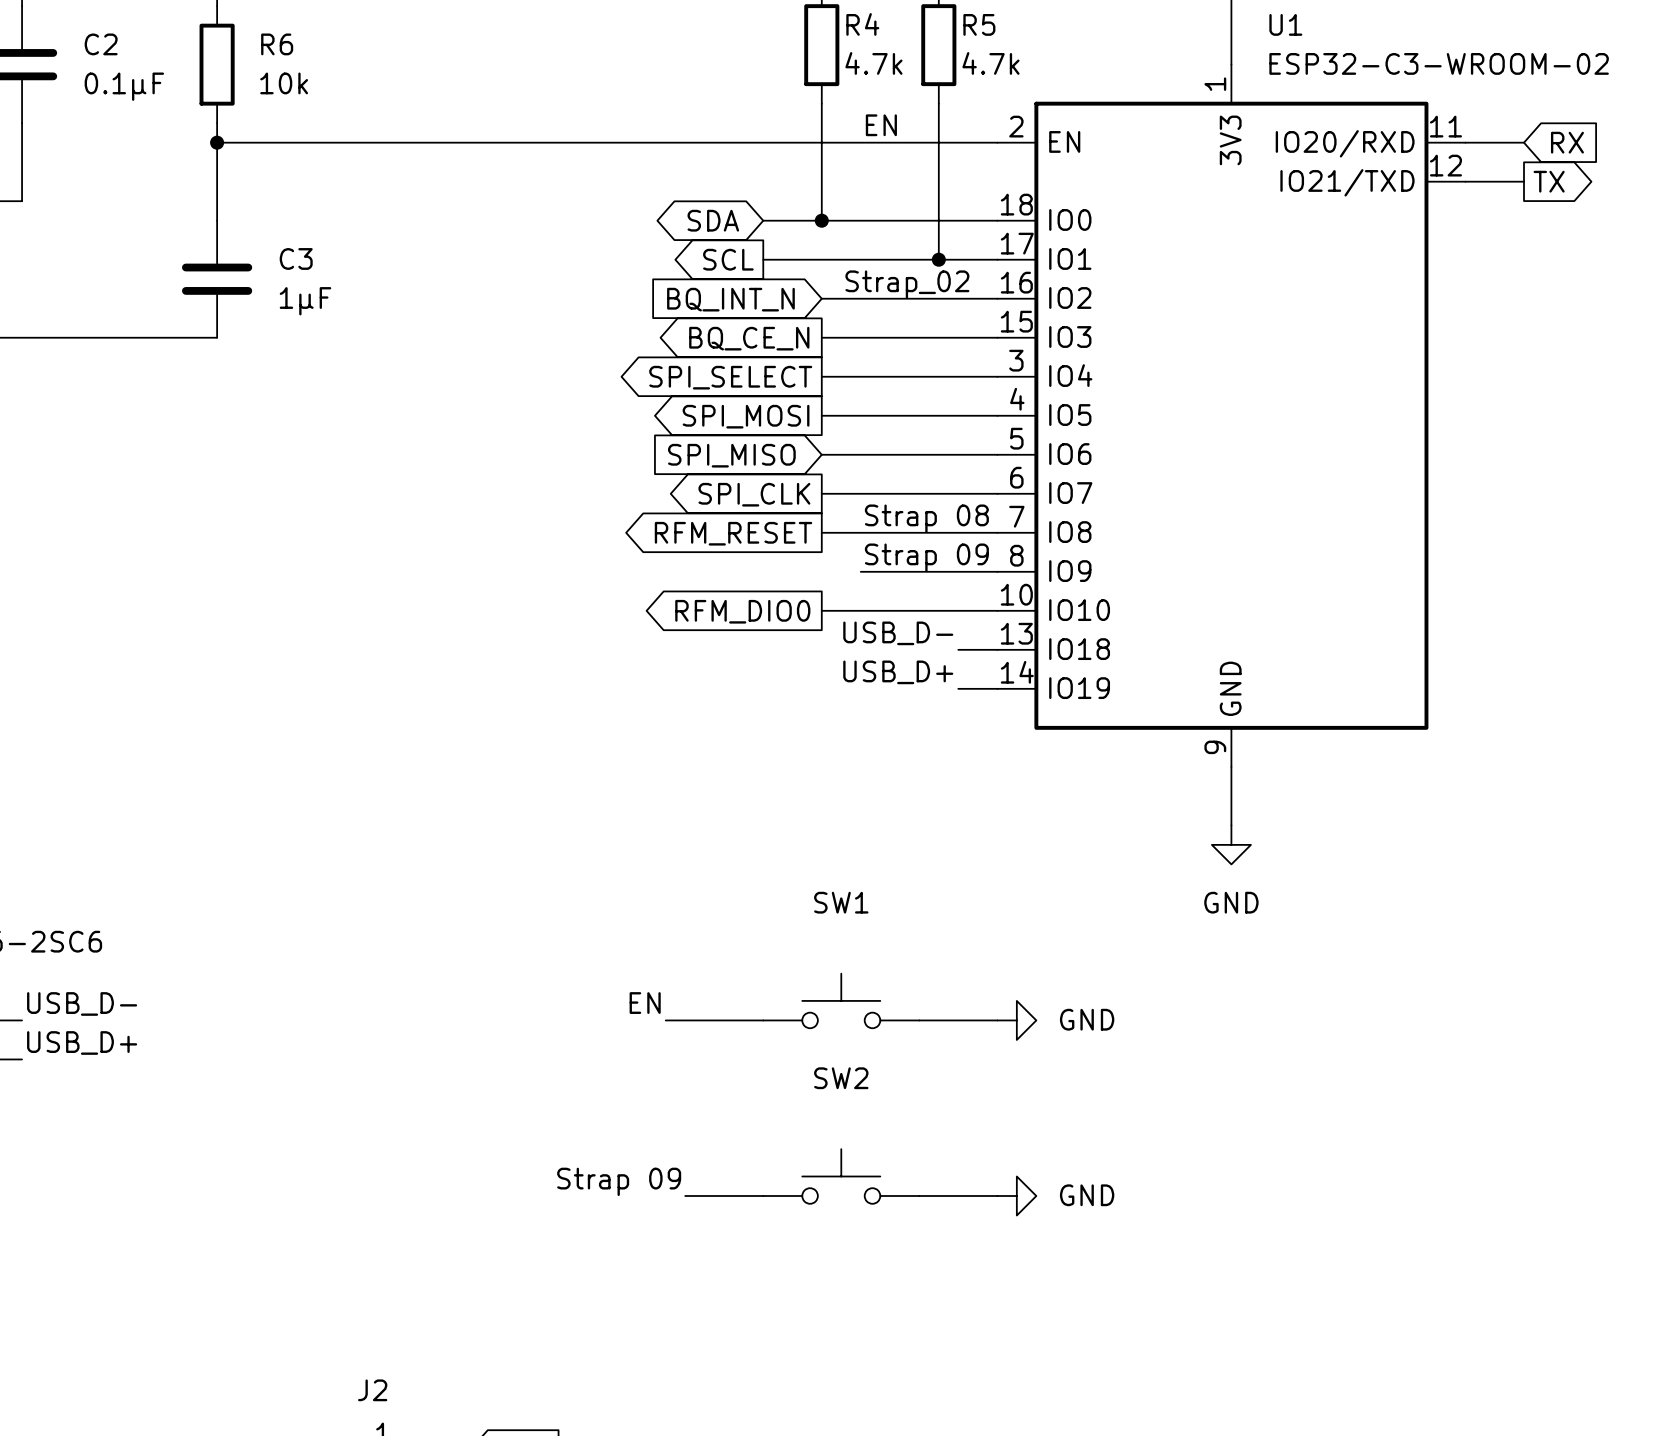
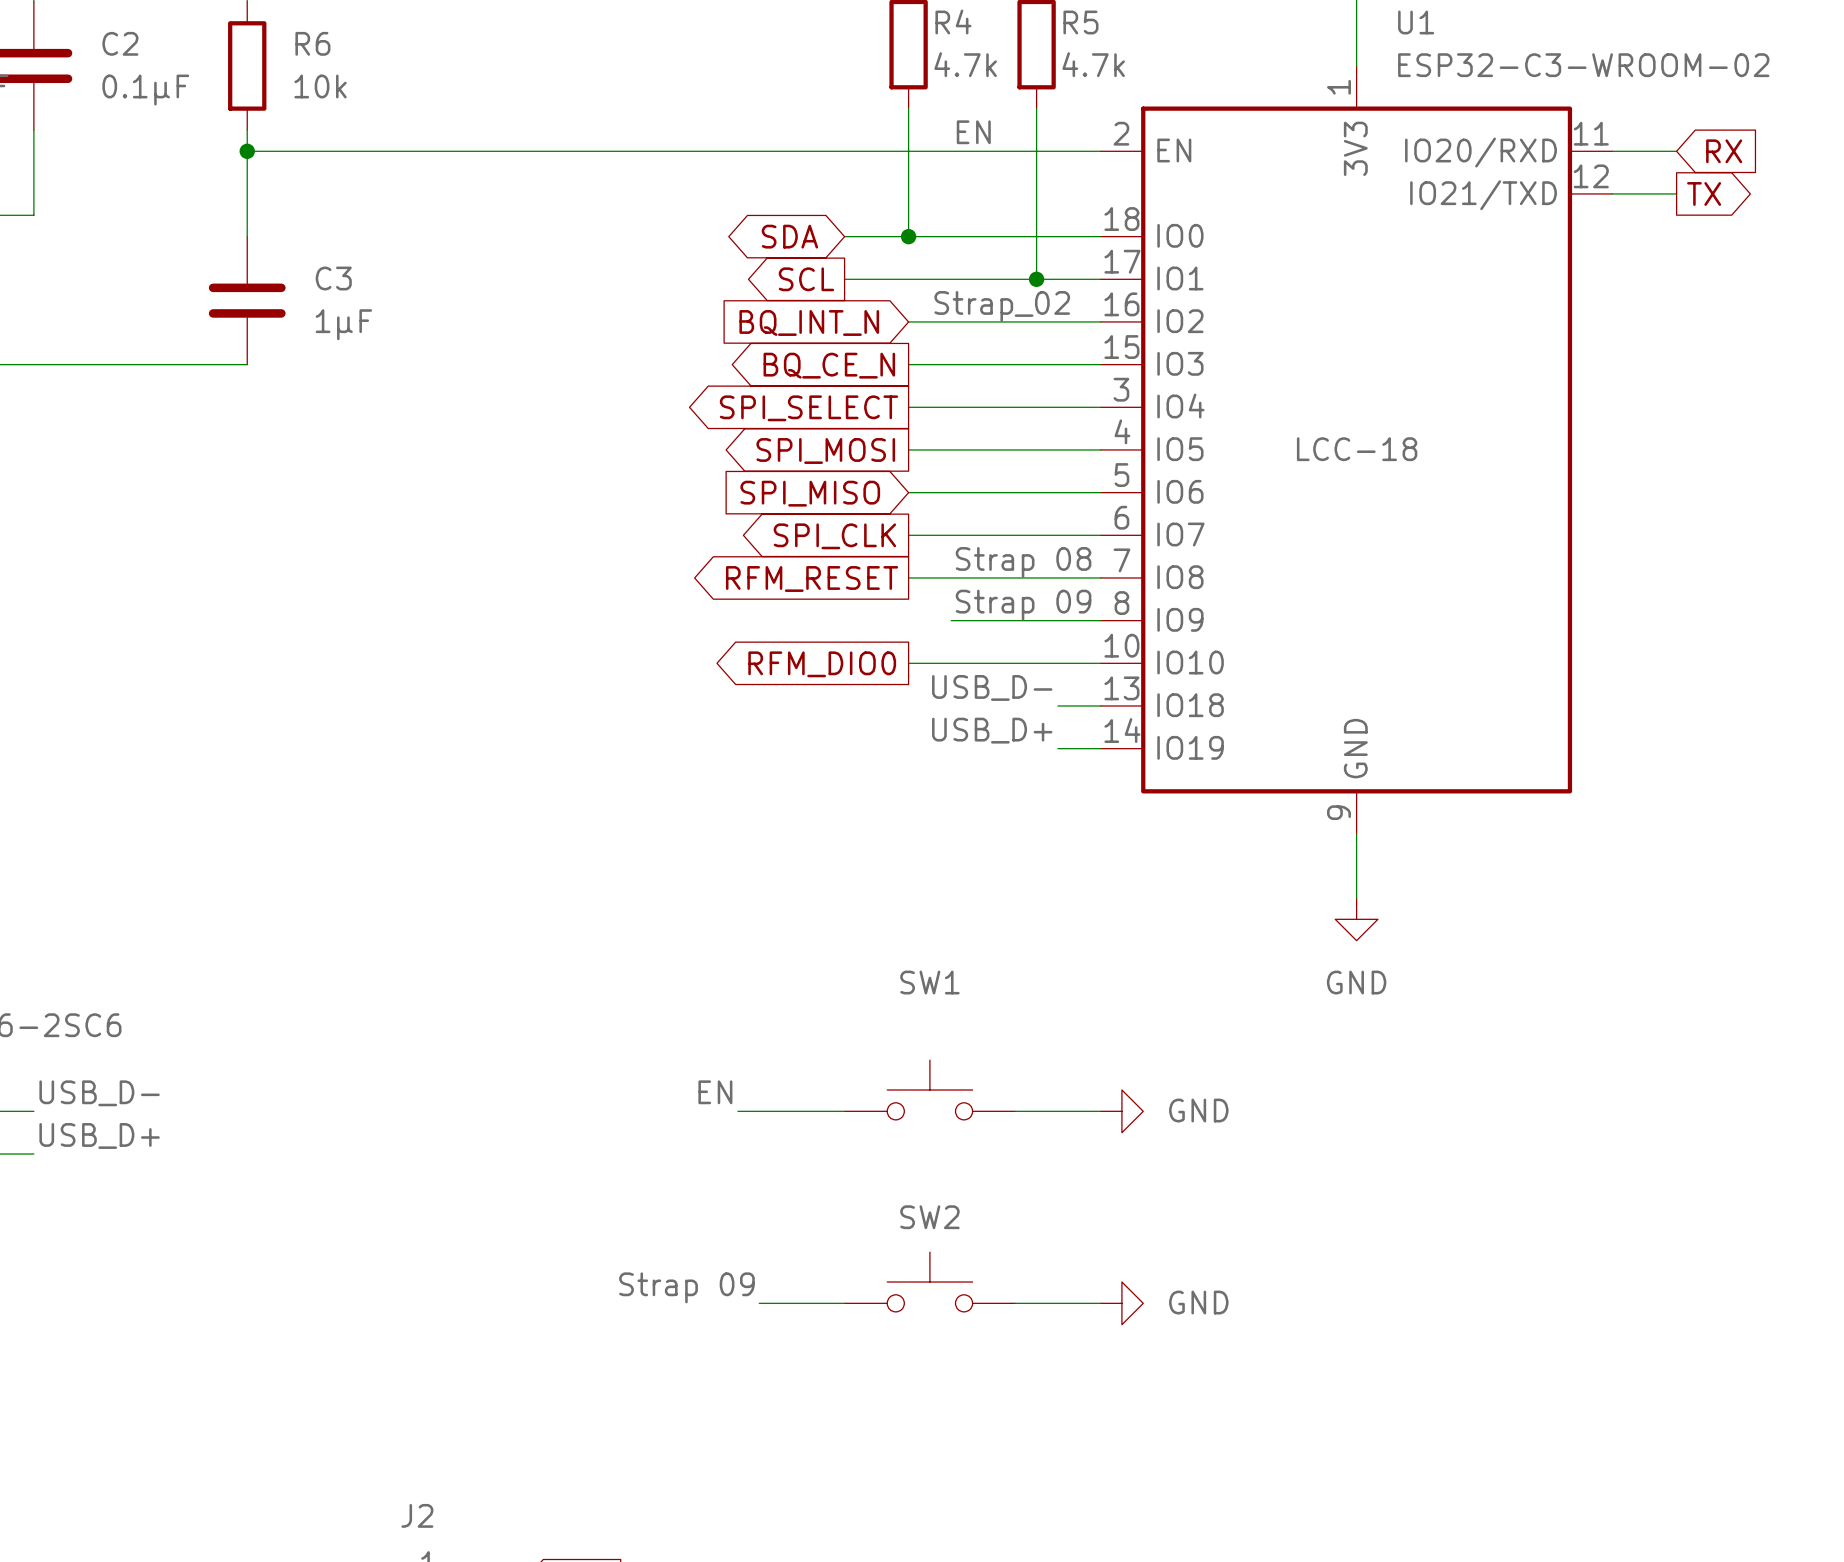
U1 text: none -> LCC-18 (1357, 449)
SW2 name position: SW2 (841, 1078) -> SW2 (929, 1217)

